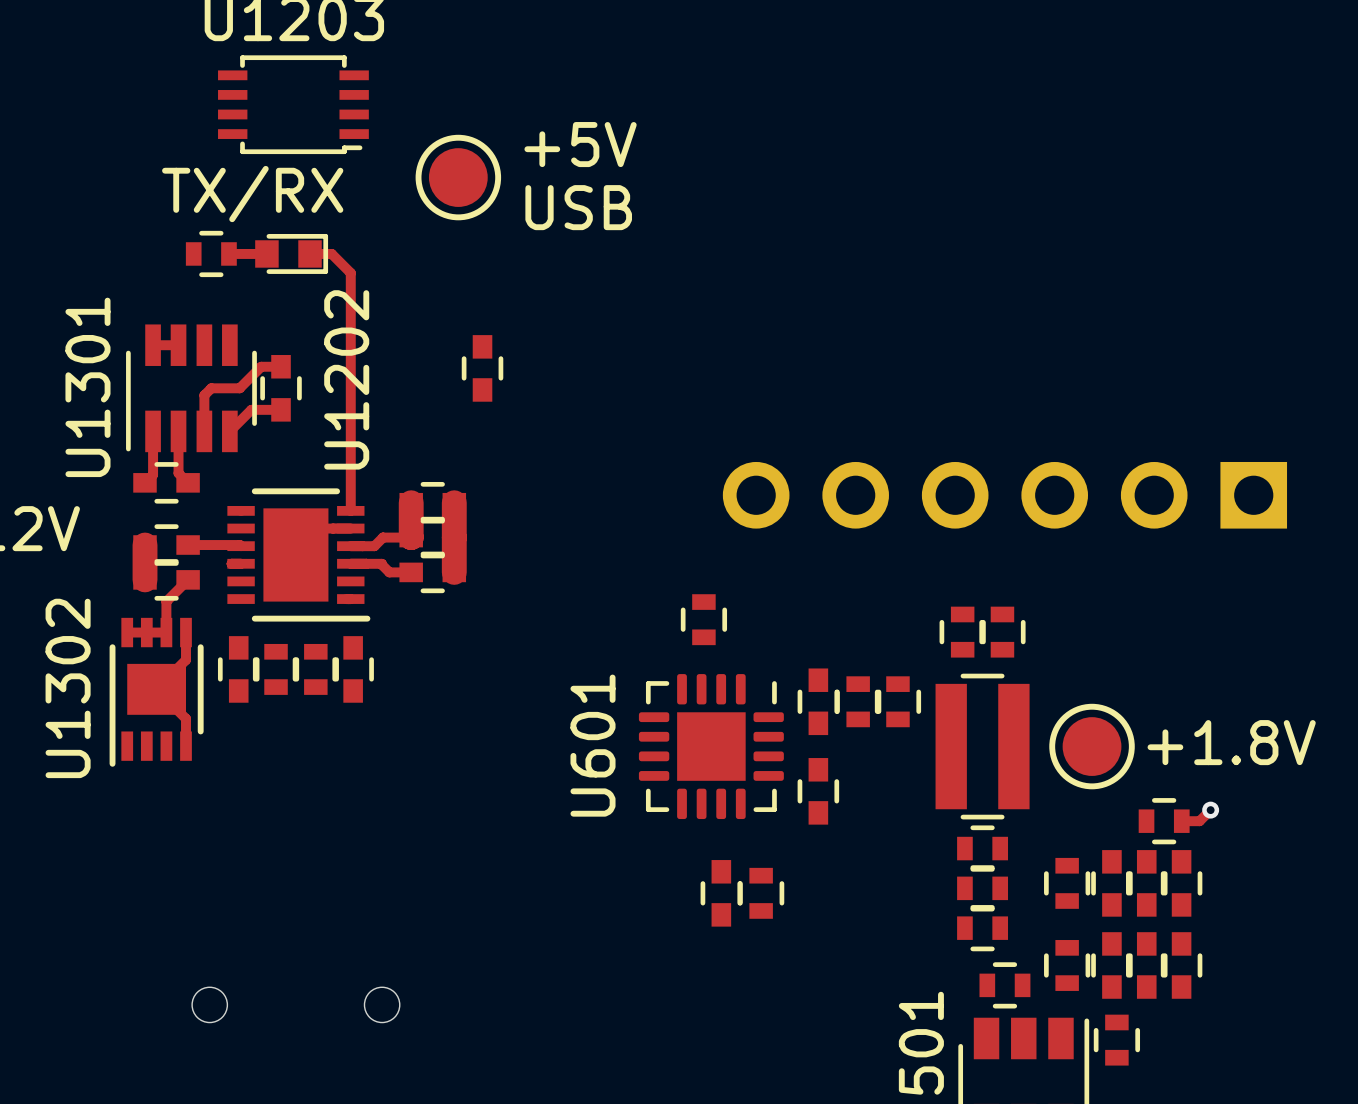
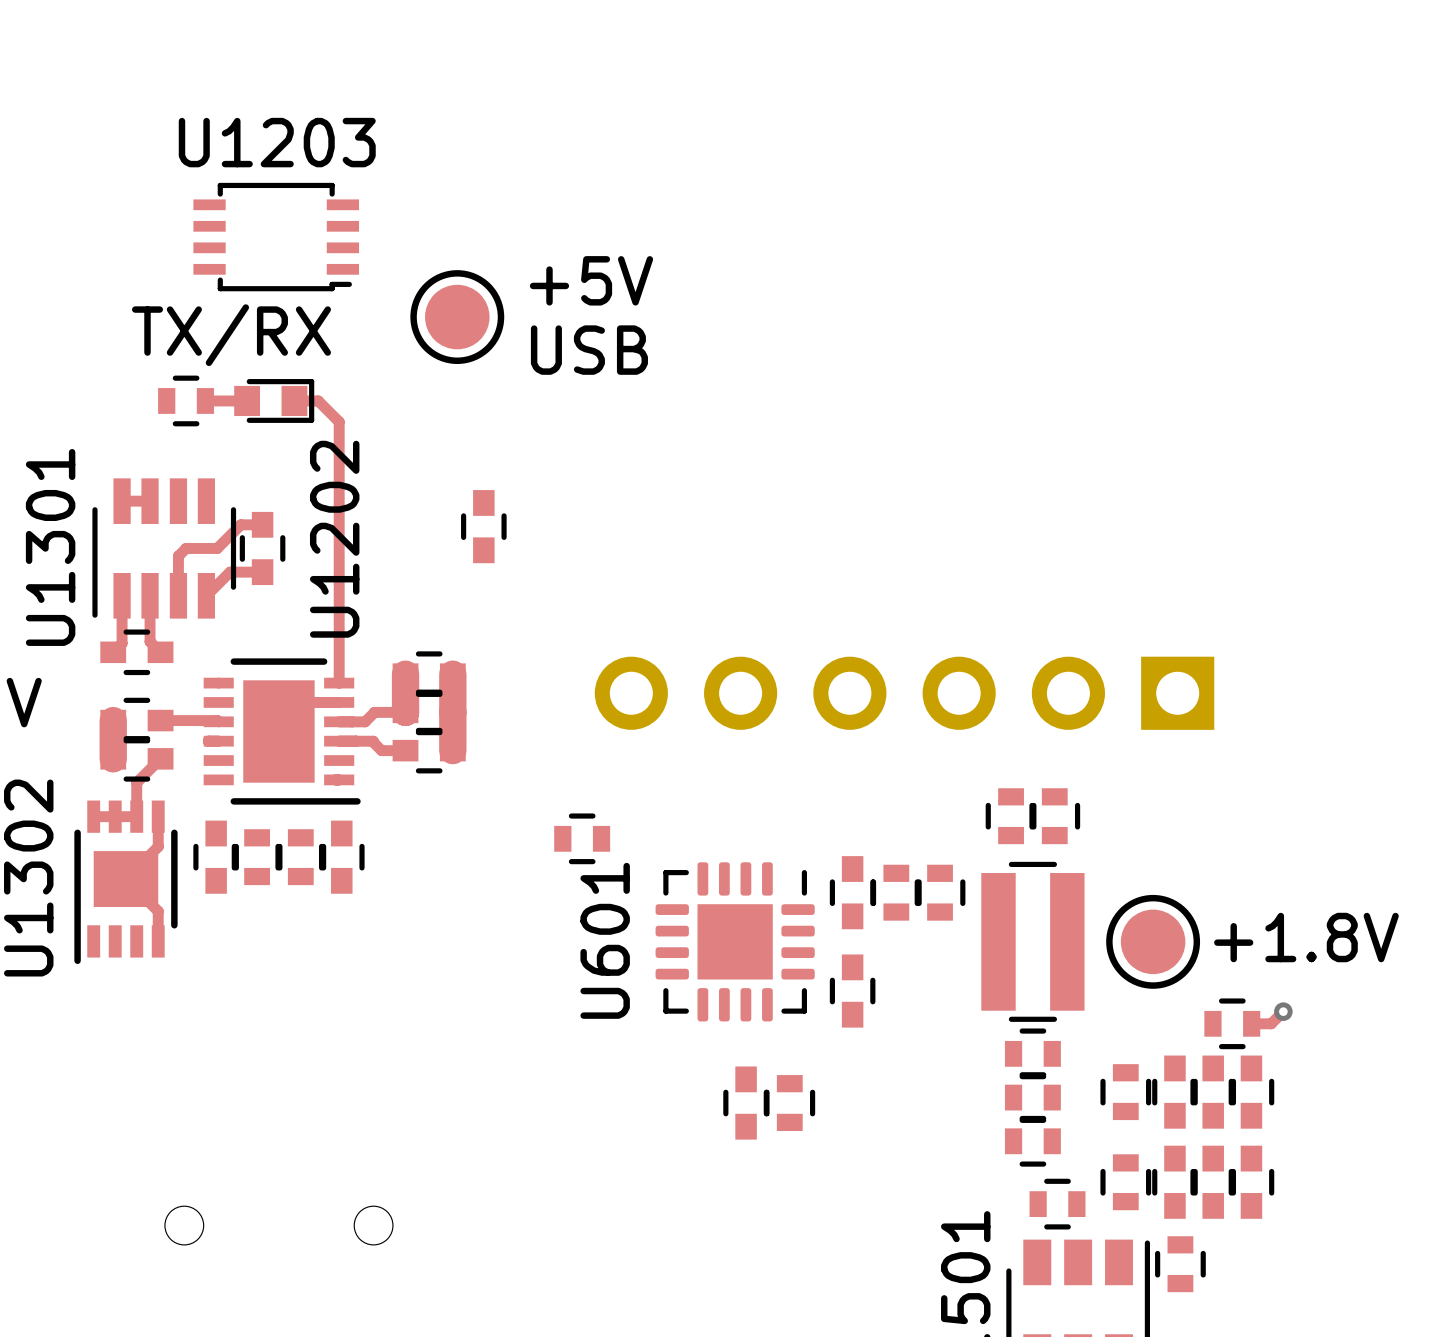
part position: (1004, 495) -> (904, 693)
part rotation: 0° (703, 619) -> 90° clockwise (582, 838)
part position: (703, 619) -> (582, 838)

